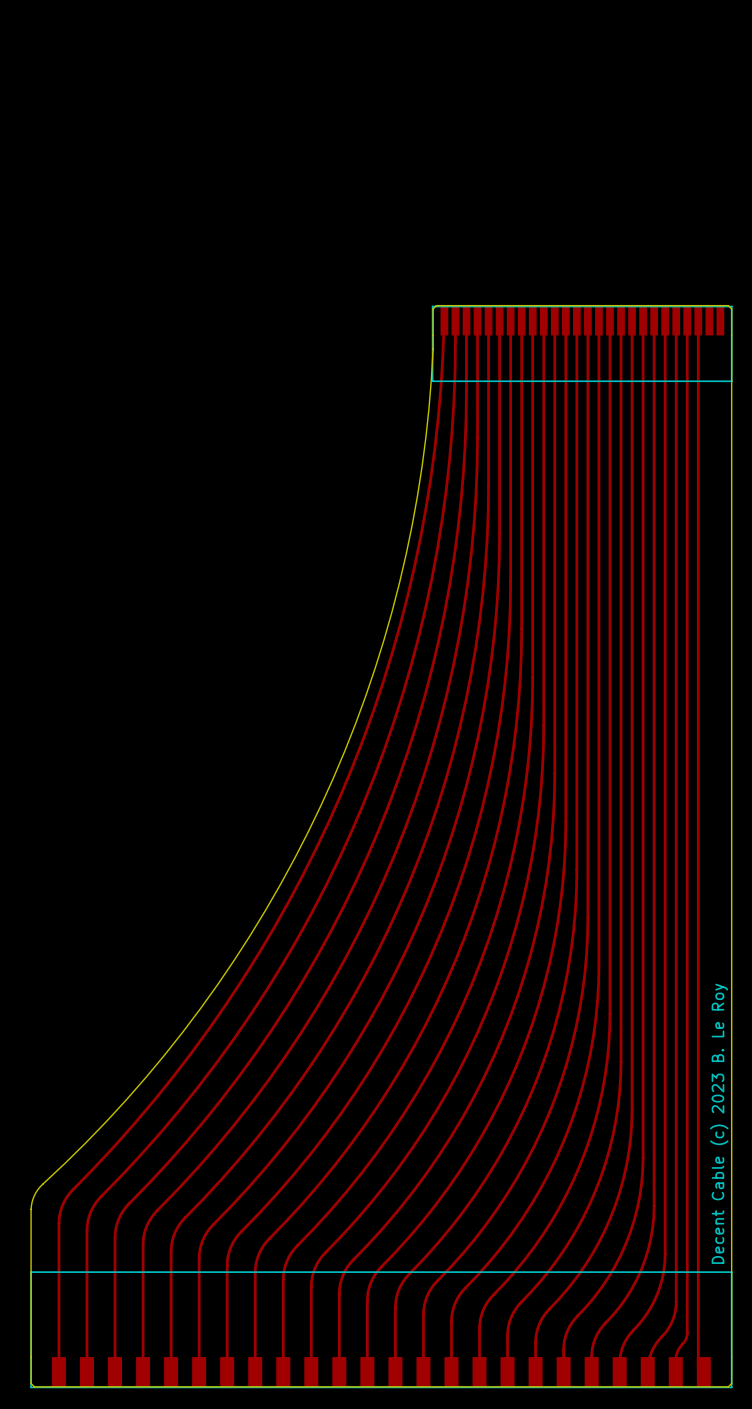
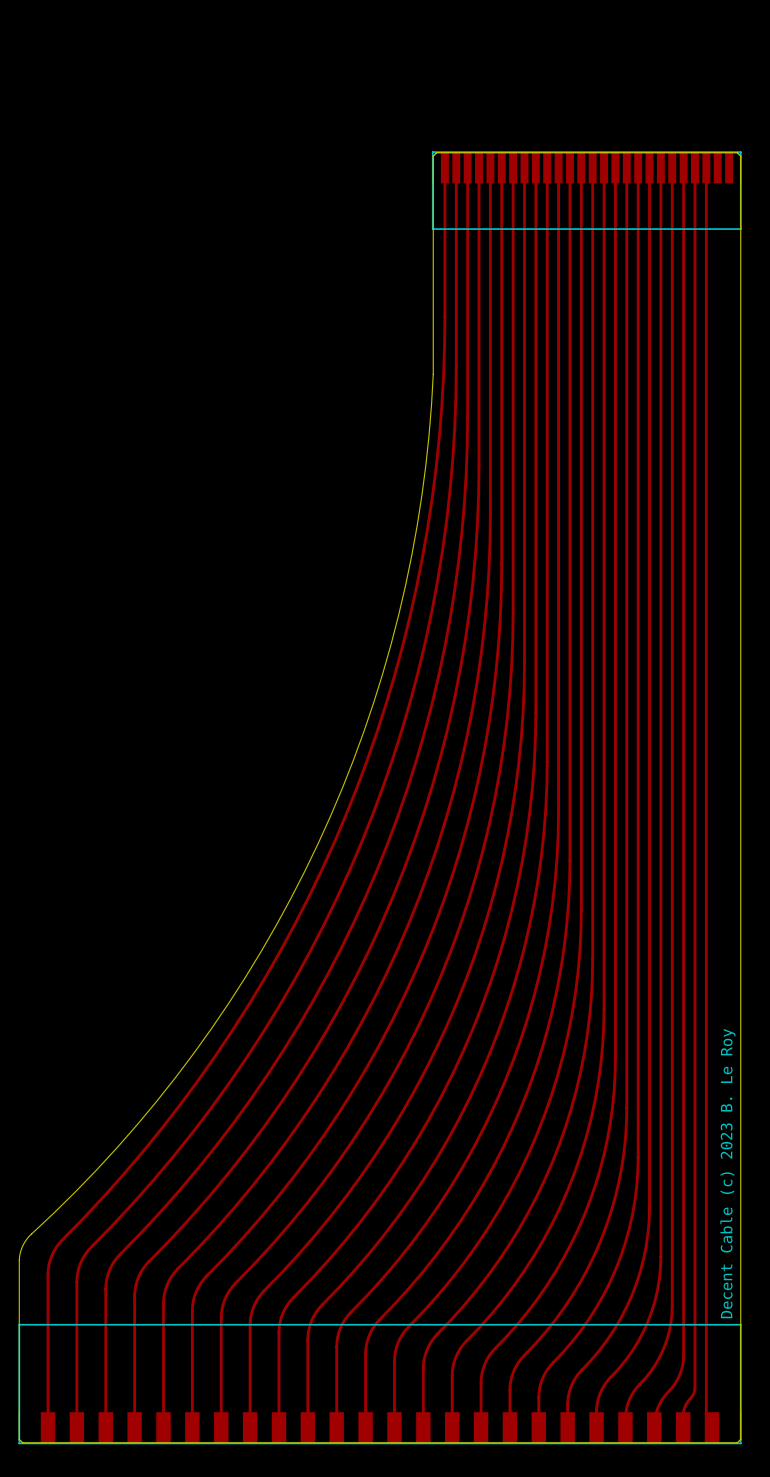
track: none -> (456, 168) (456, 344)
track: none -> (467, 168) (467, 344)
track: none -> (479, 168) (479, 344)
track: none -> (490, 168) (490, 344)
track: none -> (501, 168) (501, 344)
track: none -> (513, 168) (513, 344)
track: none -> (524, 168) (524, 344)
track: none -> (535, 168) (535, 344)
track: none -> (547, 168) (547, 344)
track: none -> (558, 168) (558, 344)
track: none -> (569, 168) (569, 344)
track: none -> (581, 168) (581, 344)
track: none -> (592, 168) (592, 344)
track: none -> (604, 168) (604, 344)
track: none -> (615, 168) (615, 344)
track: none -> (626, 168) (626, 344)
track: none -> (638, 168) (638, 344)
track: none -> (649, 168) (649, 344)
track: none -> (660, 168) (660, 344)
track: none -> (672, 168) (672, 344)
track: none -> (683, 168) (683, 344)
track: none -> (694, 168) (694, 344)
track: none -> (706, 168) (706, 344)
board edge: none -> (433, 183) (433, 360)
board edge: none -> (740, 183) (740, 360)
line: (432, 306) (731, 306) (731, 381) (432, 381) (432, 306) -> (432, 152) (740, 152) (740, 229) (432, 229) (432, 152)
part position: (582, 320) -> (586, 168)
track: (443, 328) (434, 448) (414, 566) (383, 682) (340, 794) (288, 902) (225, 1004) (153, 1100) (72, 1189) -> (444, 168) (443, 376) (432, 496) (410, 615) (395, 673) (367, 759) (333, 843) (308, 898) (279, 951) (233, 1029) (162, 1127) (104, 1196) (62, 1239)

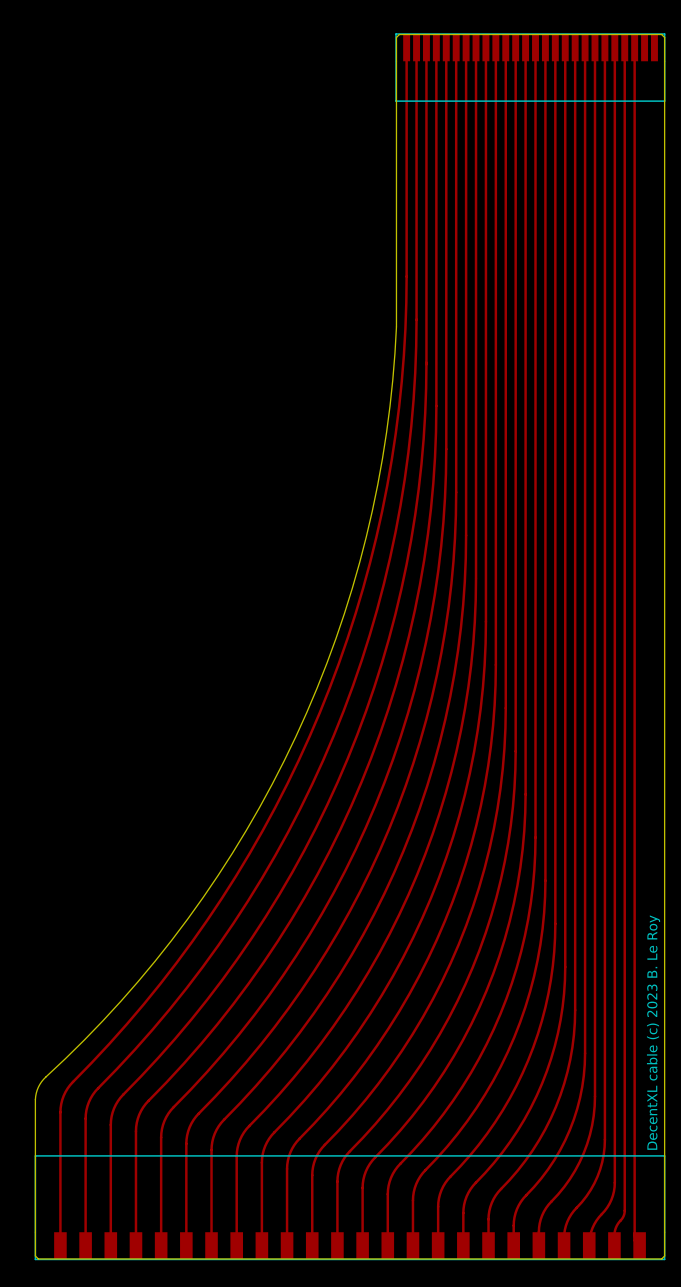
track: none -> (406, 47) (406, 147)
track: none -> (416, 47) (416, 147)
track: none -> (426, 47) (426, 147)
track: none -> (436, 47) (436, 147)
track: none -> (446, 47) (446, 147)
track: none -> (456, 47) (456, 147)
track: none -> (466, 47) (466, 147)
track: none -> (476, 47) (476, 147)
track: none -> (485, 47) (485, 147)
track: none -> (495, 47) (495, 147)
track: none -> (505, 47) (505, 147)
track: none -> (515, 47) (515, 147)
track: none -> (525, 47) (525, 147)
track: none -> (535, 47) (535, 147)
track: none -> (545, 47) (545, 147)
track: none -> (555, 47) (555, 147)
track: none -> (565, 47) (565, 147)
track: none -> (575, 47) (575, 147)
track: none -> (585, 47) (585, 147)
track: none -> (594, 47) (594, 147)
track: none -> (604, 47) (604, 147)
track: none -> (614, 47) (614, 147)
track: none -> (624, 47) (624, 147)
track: none -> (634, 47) (634, 147)
board edge: none -> (396, 61) (396, 160)
board edge: none -> (664, 61) (664, 160)
line: (432, 152) (740, 152) (740, 229) (432, 229) (432, 152) -> (396, 34) (664, 34) (664, 101) (396, 101) (396, 34)
part position: (586, 168) -> (530, 47)
text: Decent Cable (c) 2023 B. Le Roy (727, 1173) -> DecentXL cable (c) 2023 B. Le Roy (653, 1032)

